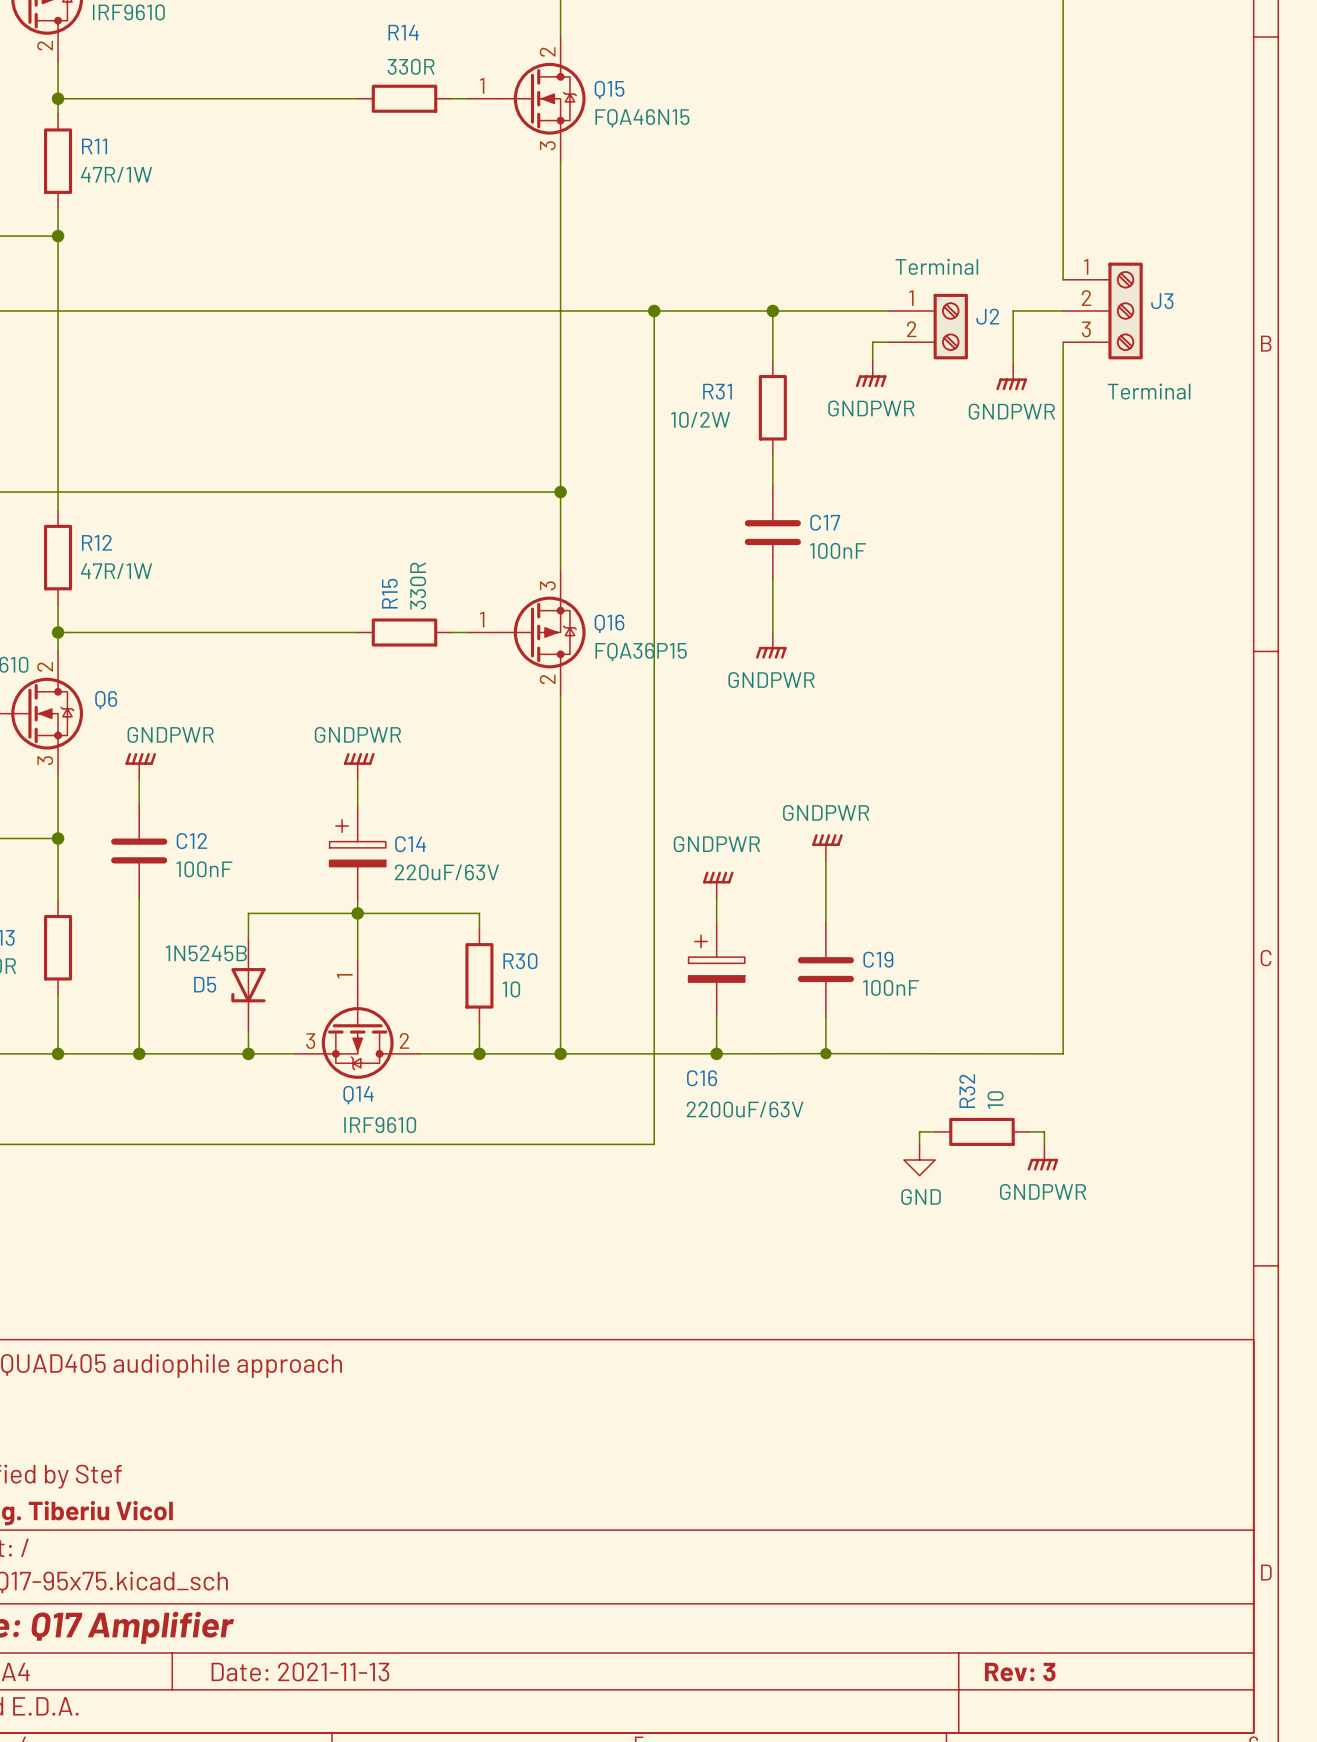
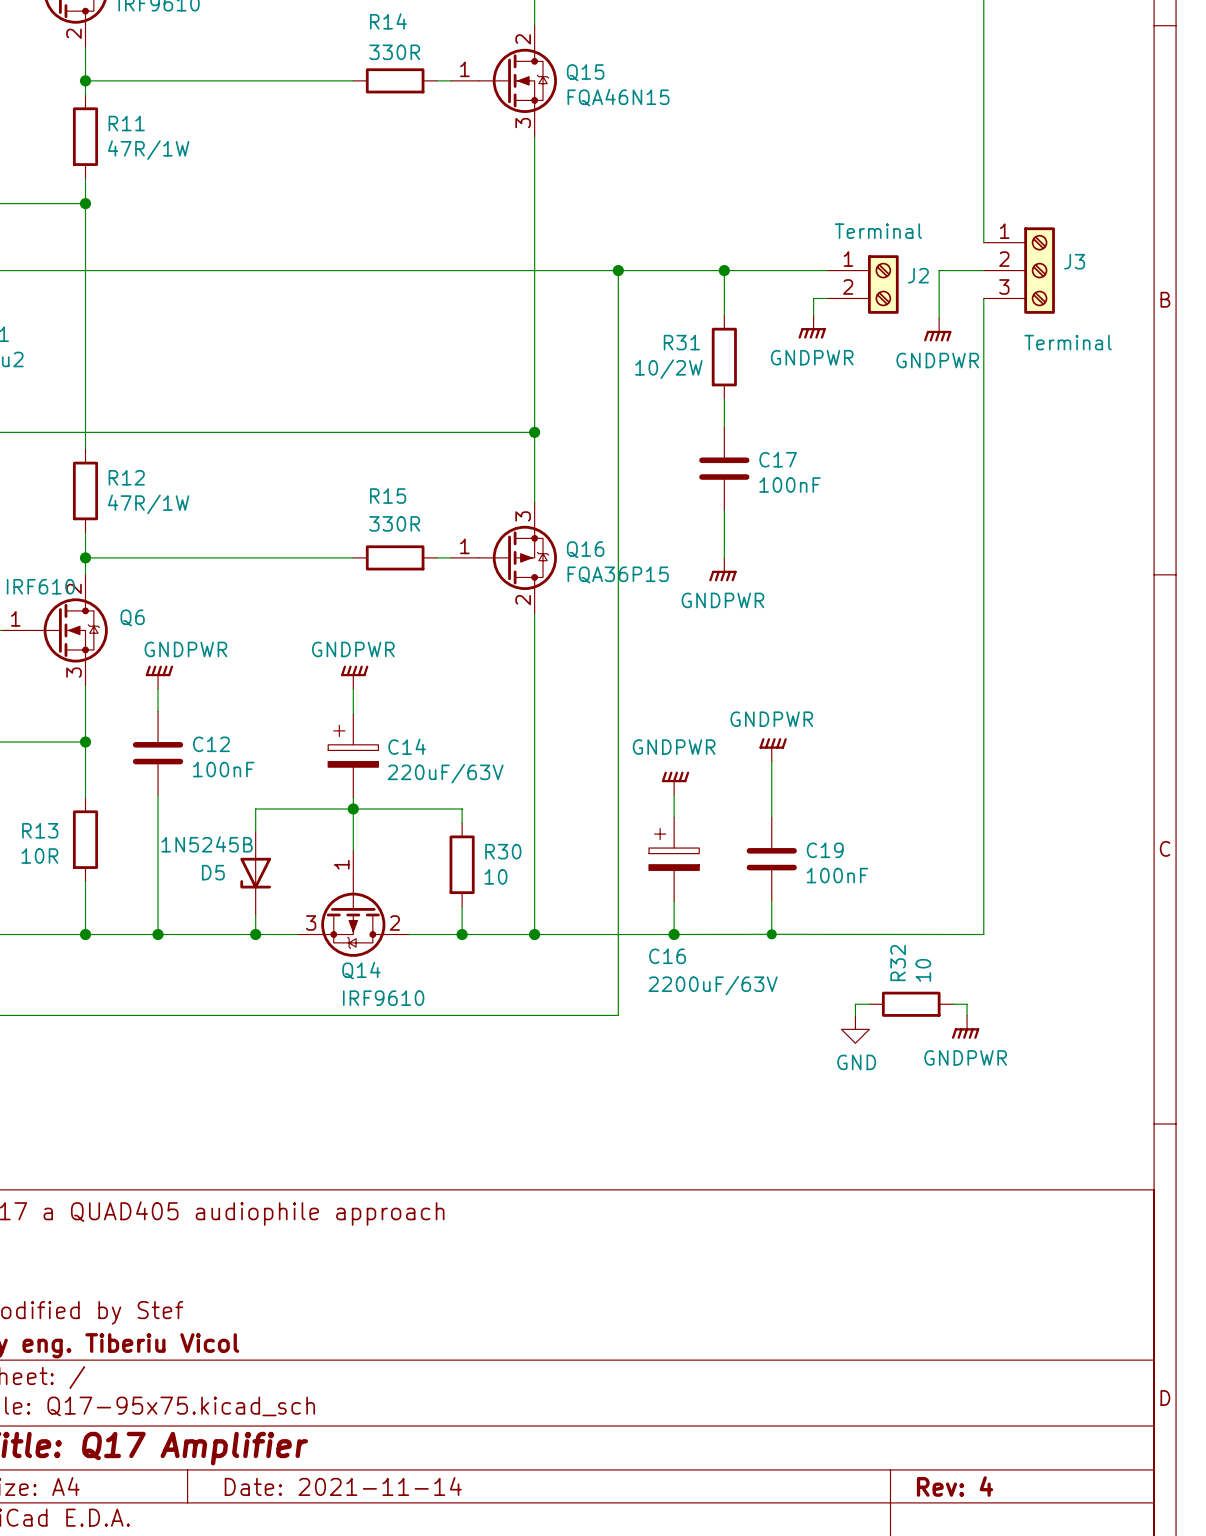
R15 value rotation: 0° (418, 586) -> 90° clockwise (394, 523)
R15 name rotation: 0° (389, 593) -> 90° clockwise (388, 496)
title block: Date: 2021-11-13 (300, 1671) -> Date: 2021-11-14 (343, 1486)
title block: Rev: 3 (1020, 1672) -> Rev: 4 (955, 1486)

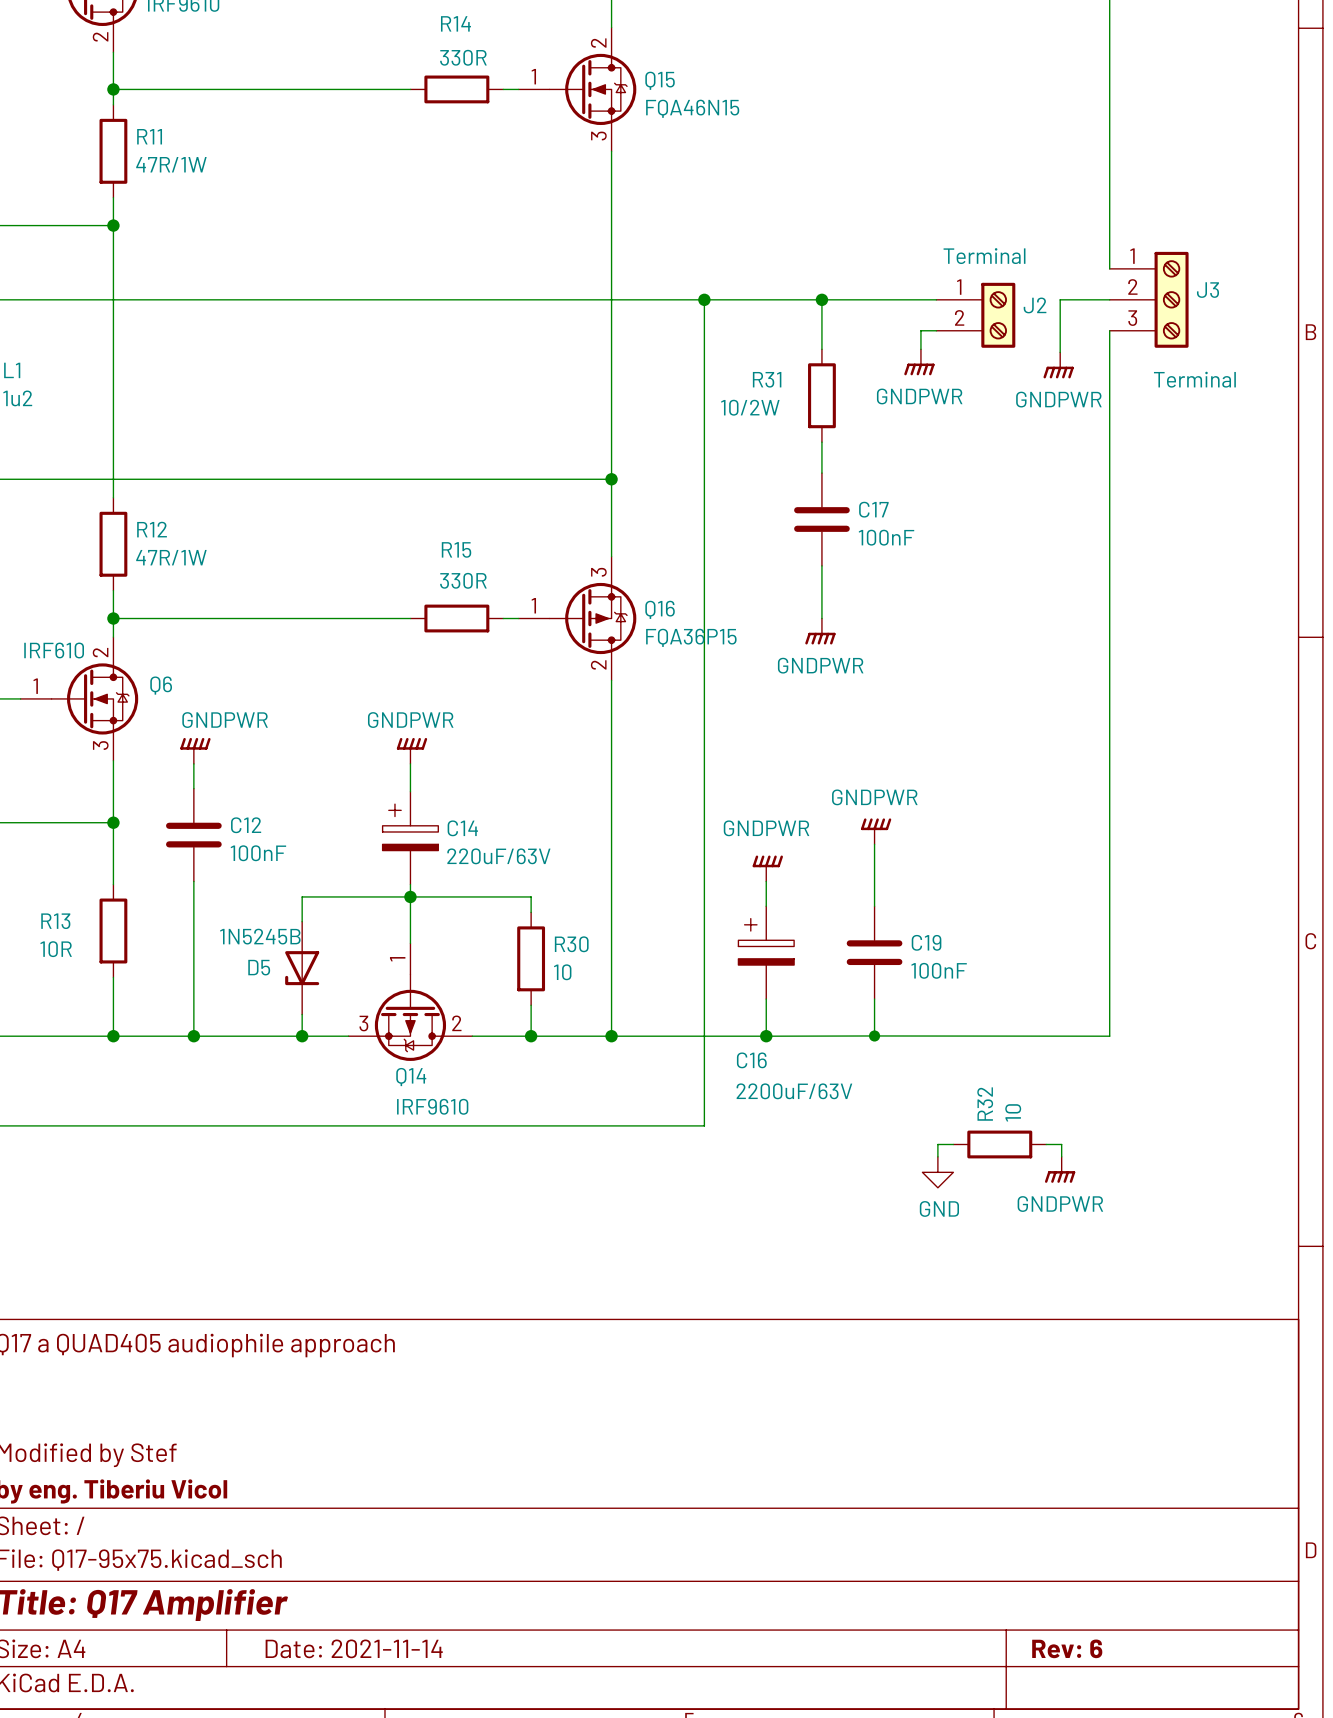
wire: (869, 1004) (855, 1004) (855, 1015) -> (953, 1144) (937, 1144) (937, 1156)
R32 position: (911, 1004) -> (999, 1144)
wire: (953, 1004) (967, 1004) (967, 1015) -> (1046, 1144) (1061, 1144) (1061, 1156)
power symbol position: GNDPWR (965, 1027) -> GNDPWR (1060, 1169)
power symbol position: GND (855, 1029) -> GND (937, 1172)
title block: Rev: 4 (955, 1486) -> Rev: 6 (1067, 1648)

